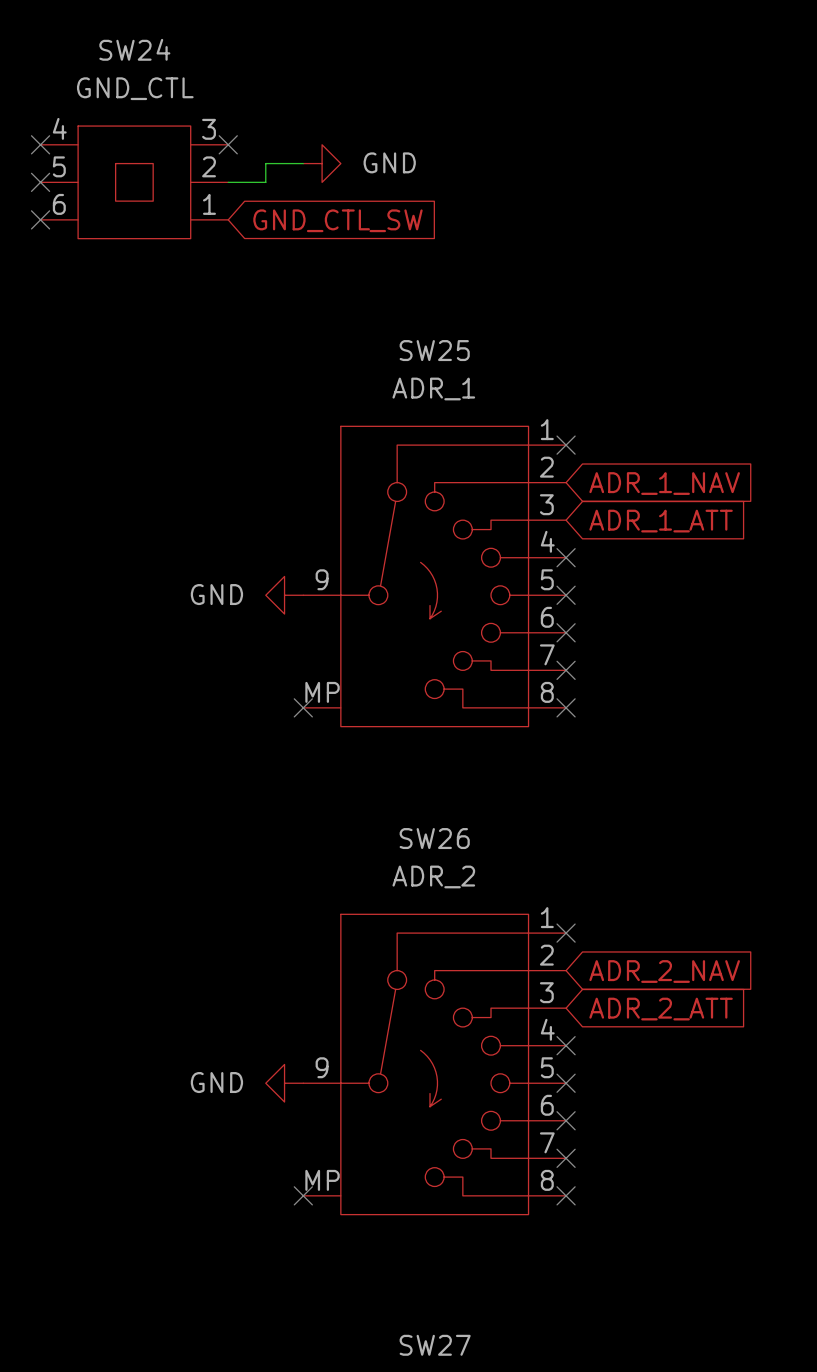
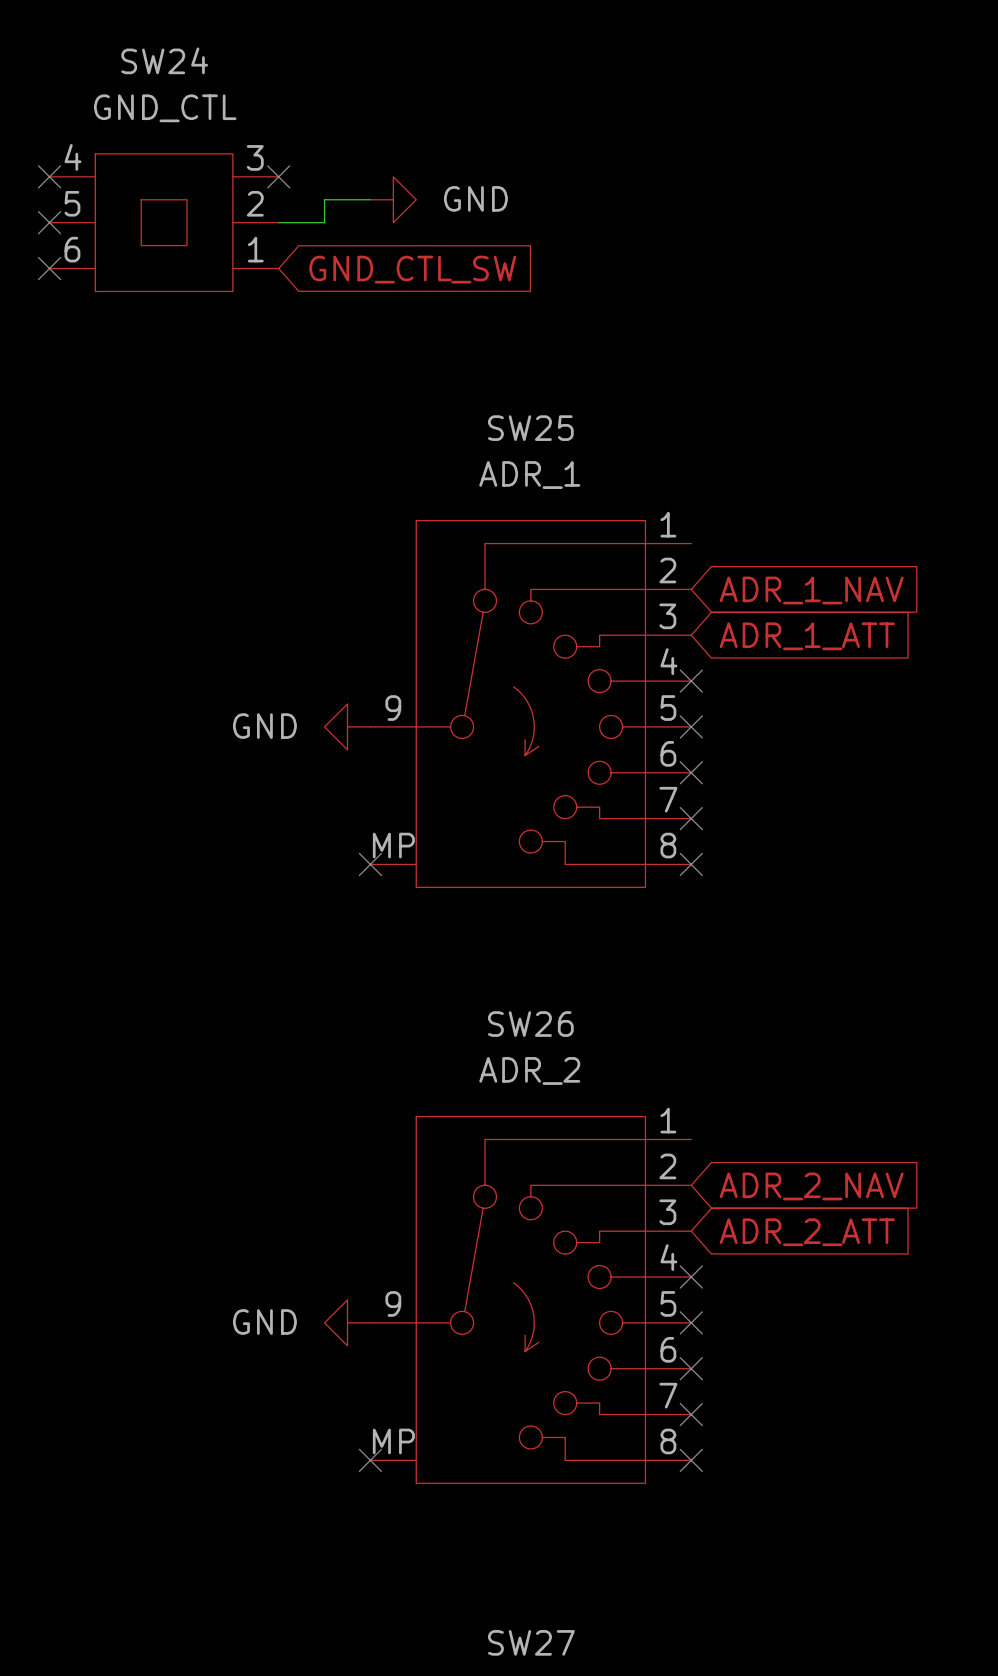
no-connect mark: (566, 445) -> none
no-connect mark: (566, 933) -> none

